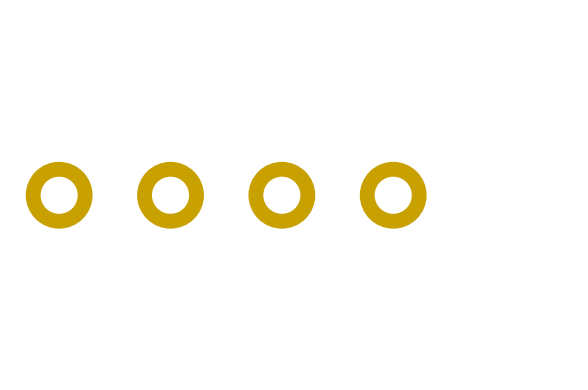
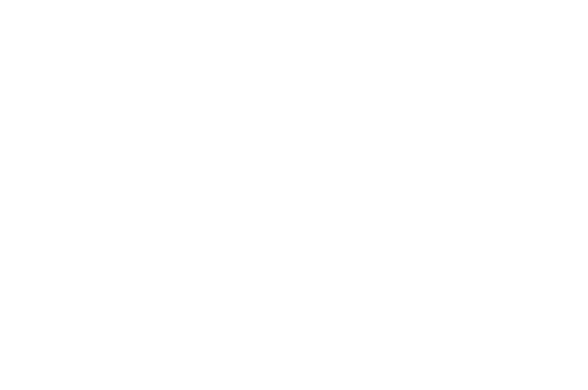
part: (59, 195) -> none
part: (170, 195) -> none
part: (281, 195) -> none
part: (393, 195) -> none

